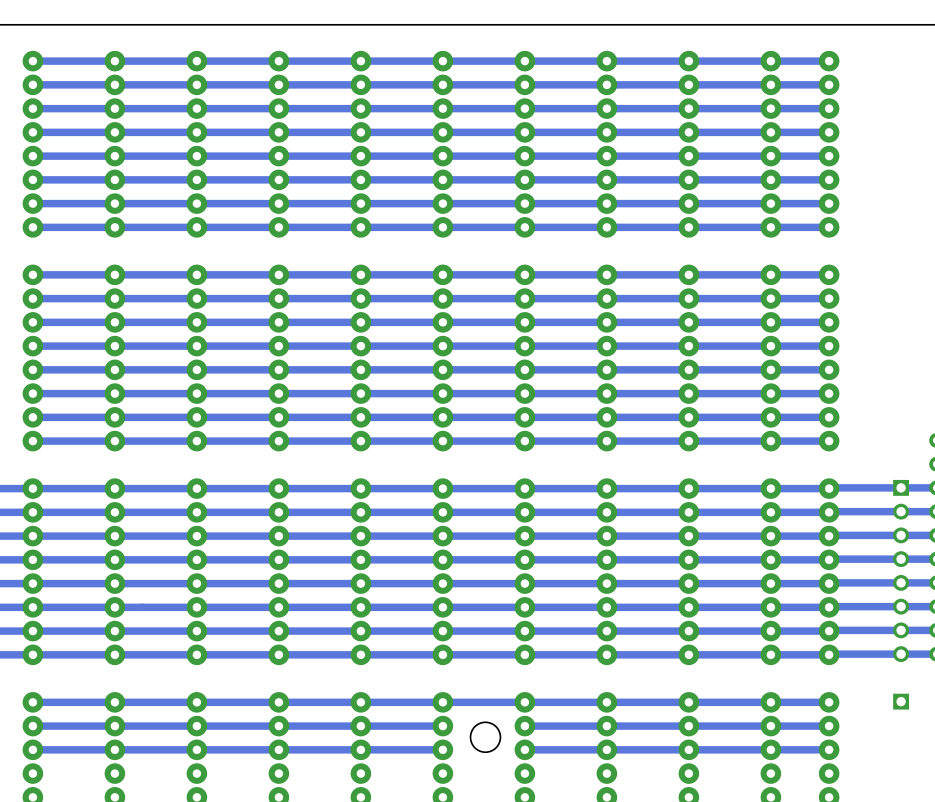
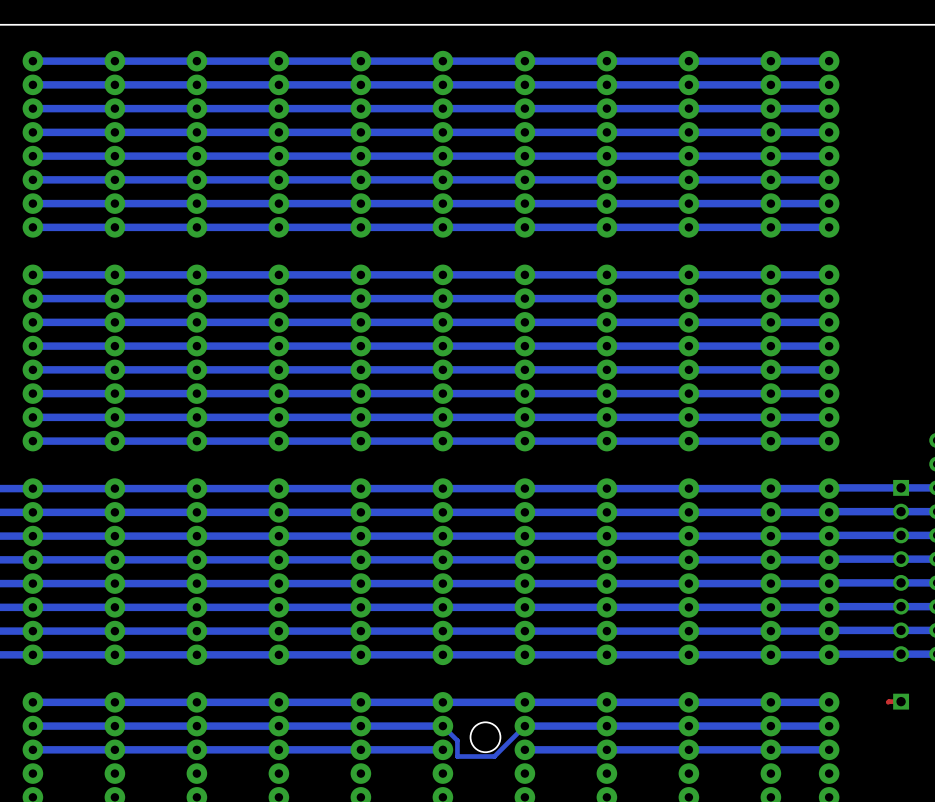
top track: none -> (901, 701) (888, 702)
bottom track: none -> (524, 726) (494, 756) (457, 756) (457, 740) (442, 726)

